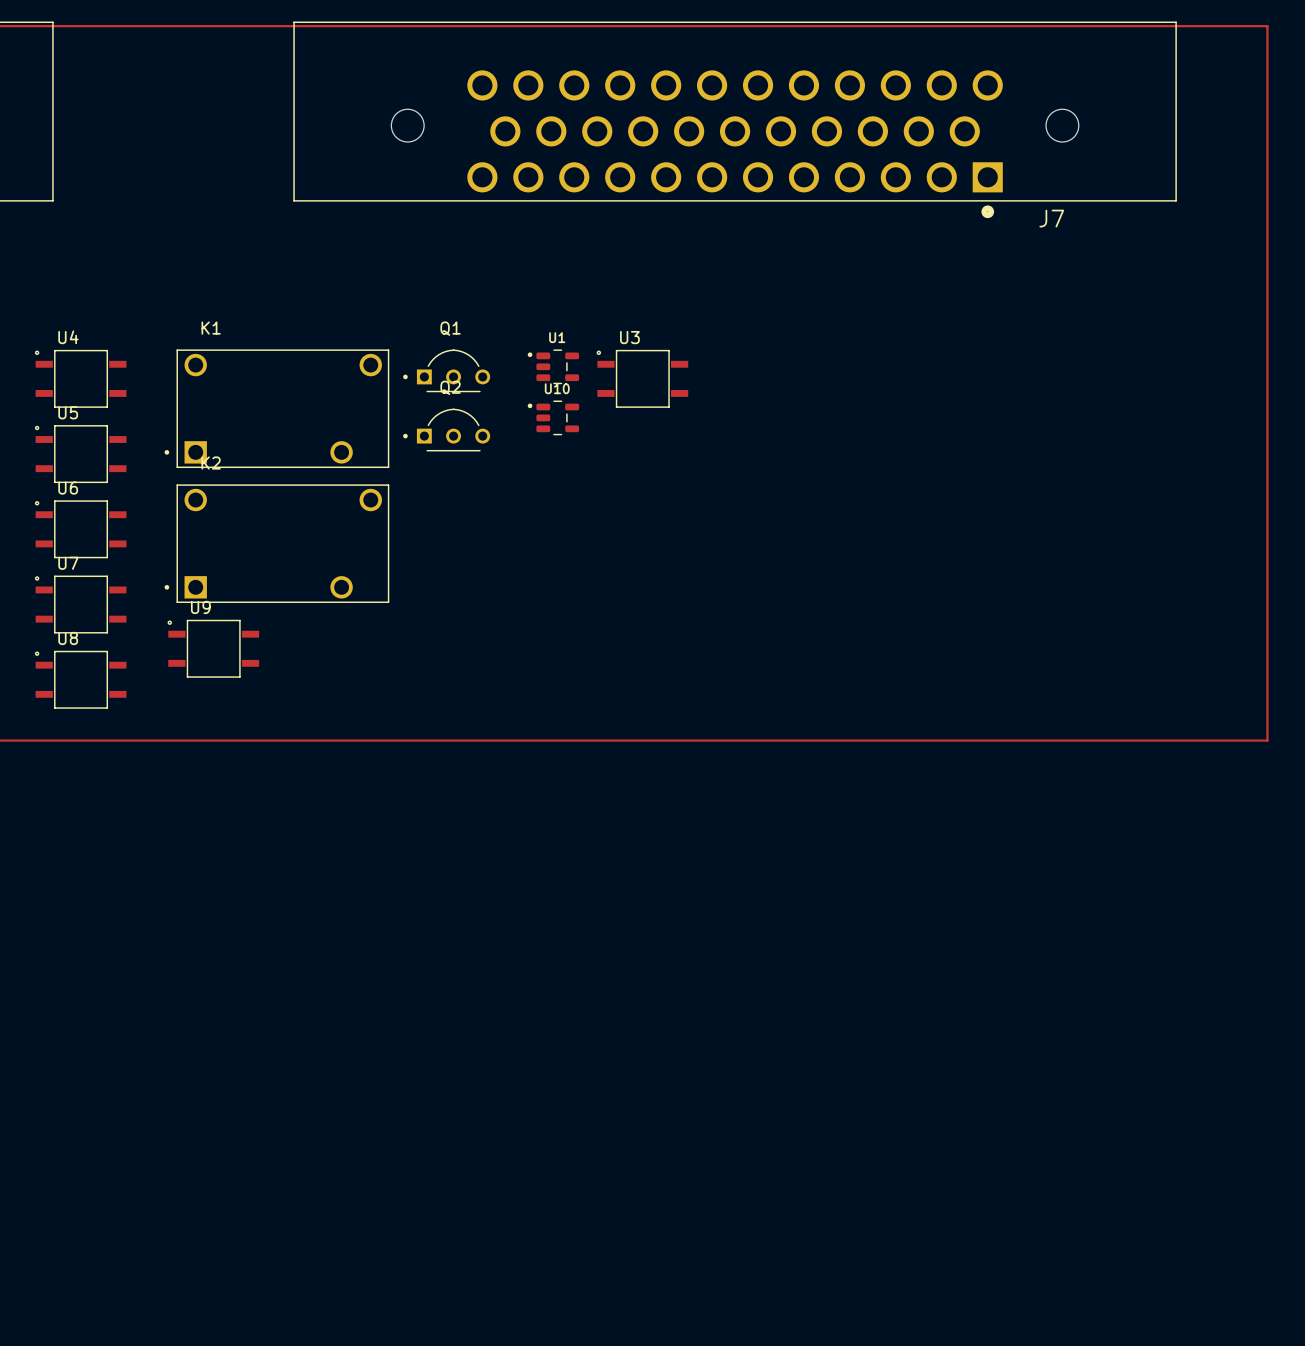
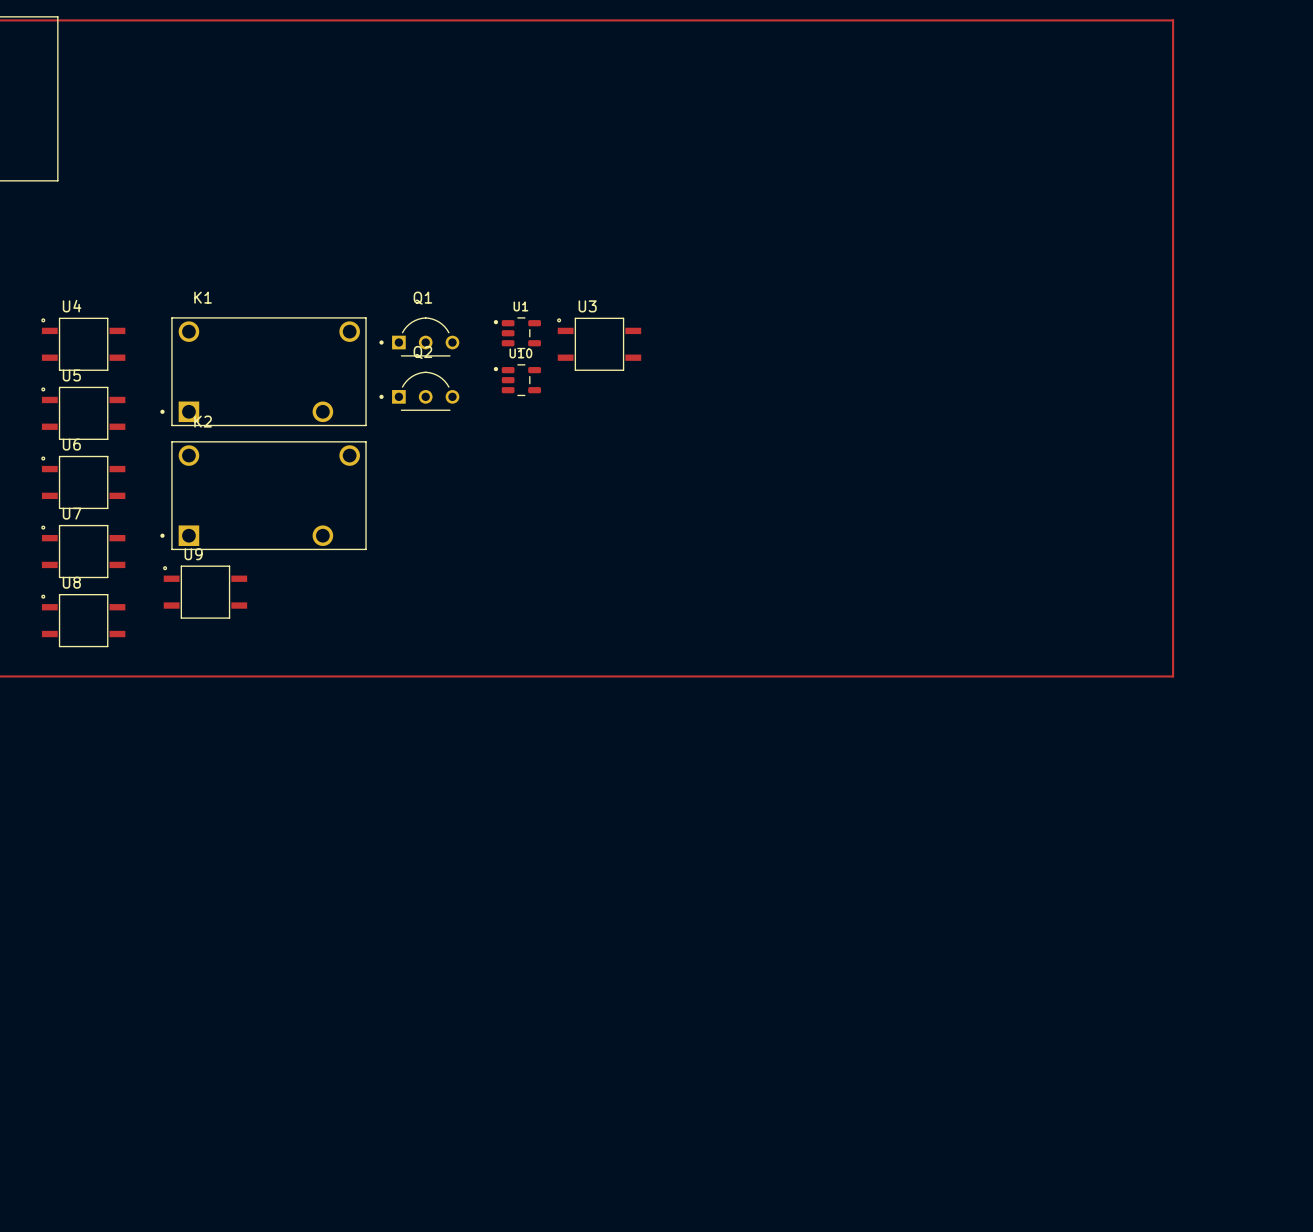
J7: (735, 119) -> none

